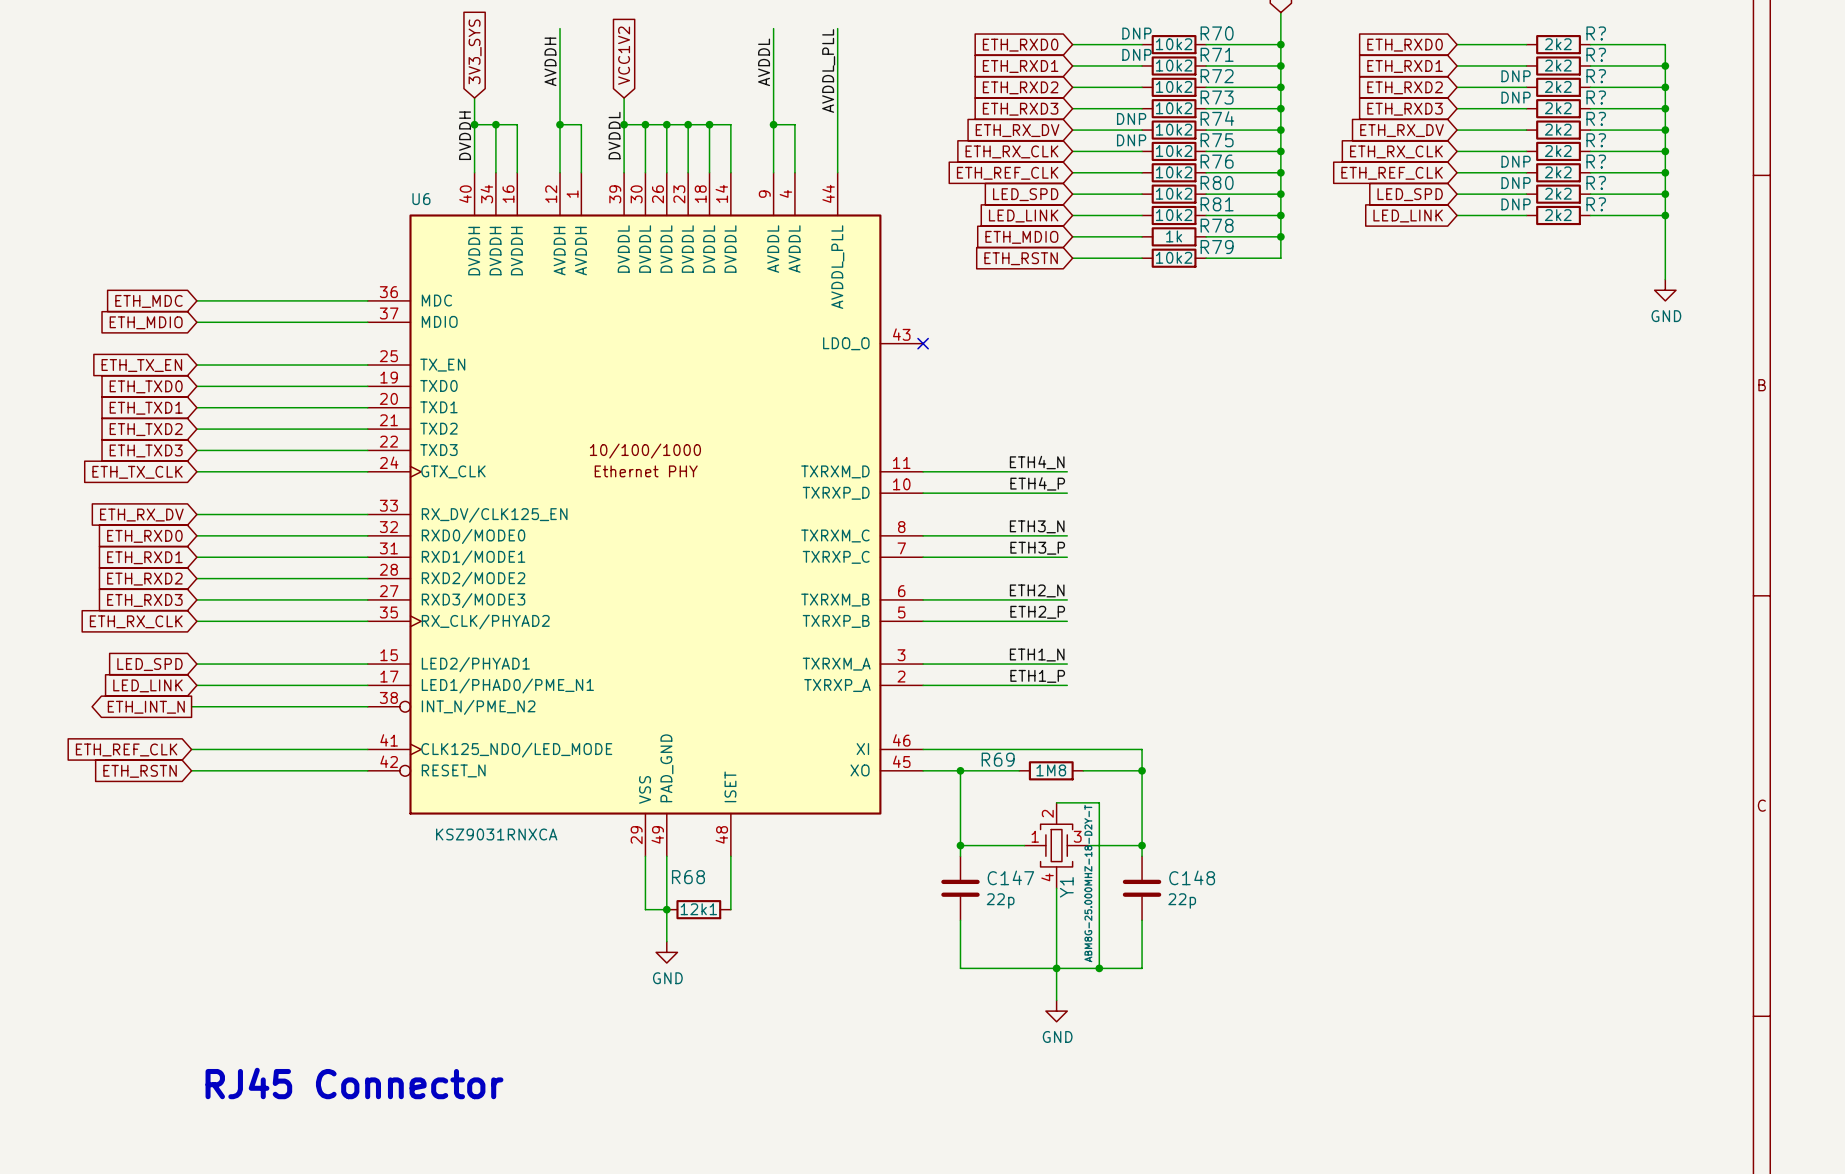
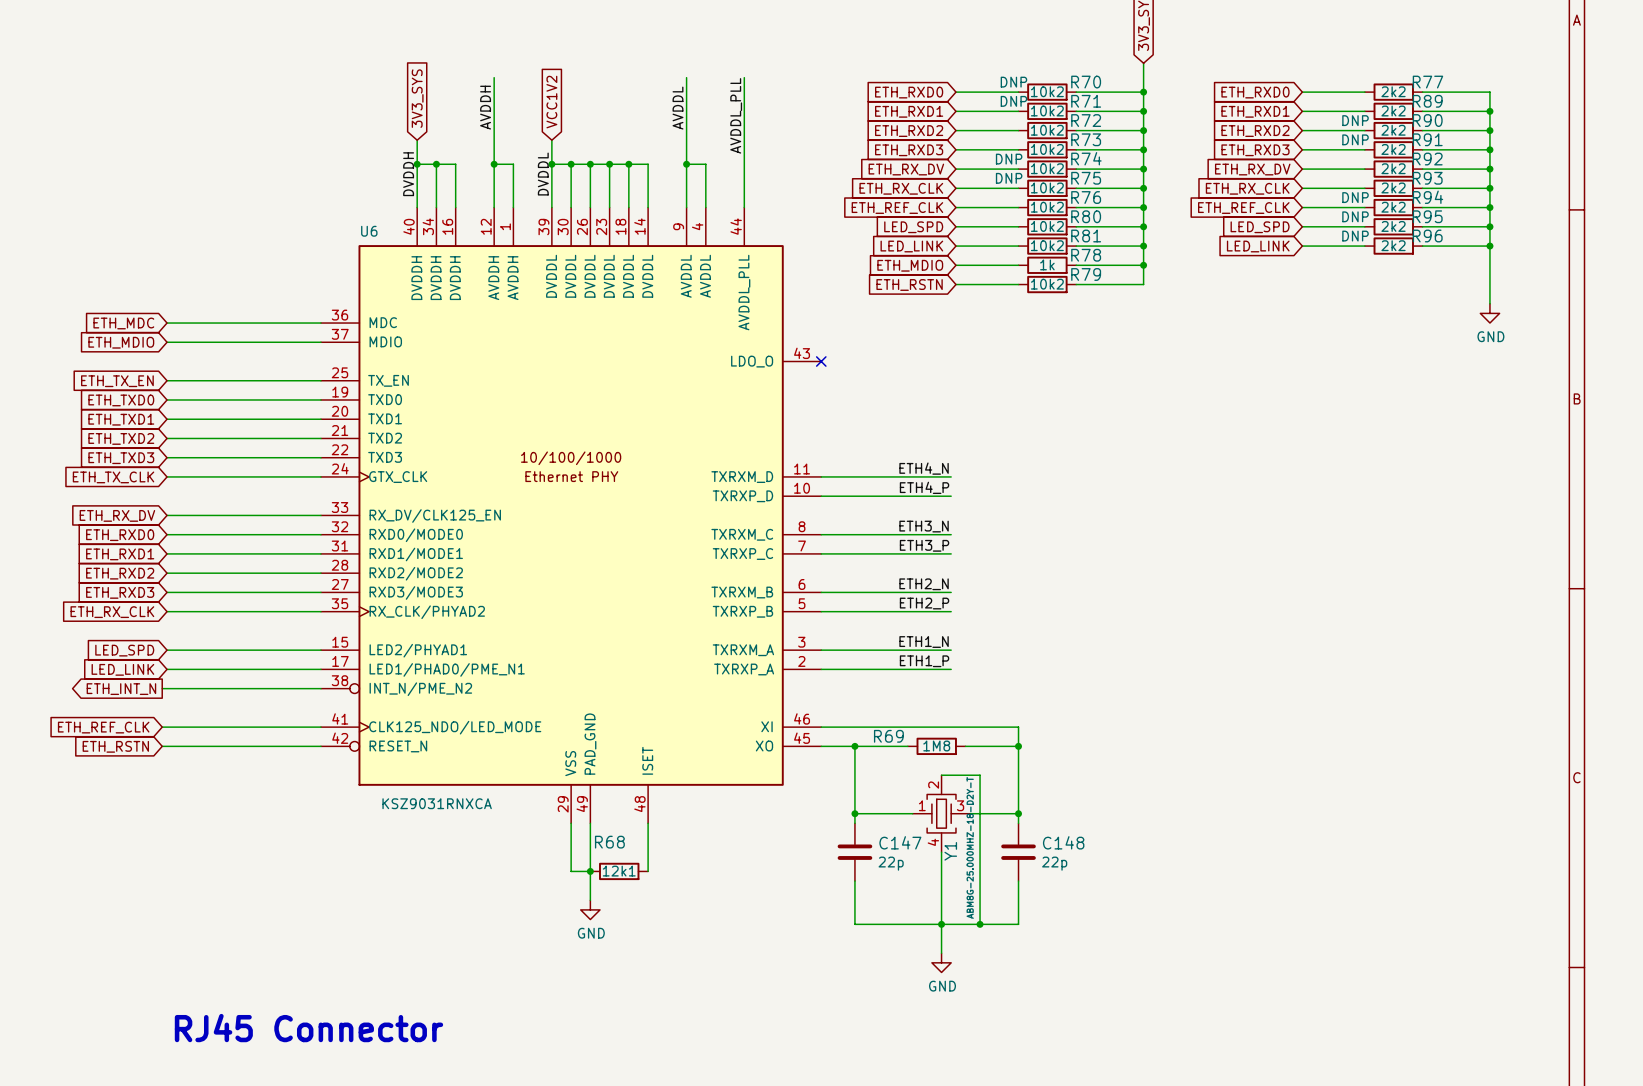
R? name: R? (1596, 33) -> R77 (1427, 82)
R? name: R? (1596, 54) -> R89 (1427, 101)
R? name: R? (1596, 76) -> R90 (1427, 120)
R? name: R? (1596, 97) -> R91 (1427, 139)
R? name: R? (1596, 118) -> R92 (1427, 159)
R? name: R? (1596, 140) -> R93 (1427, 178)
R? name: R? (1596, 161) -> R94 (1427, 197)
R? name: R? (1596, 182) -> R95 (1427, 216)
R? name: R? (1596, 204) -> R96 (1427, 236)

